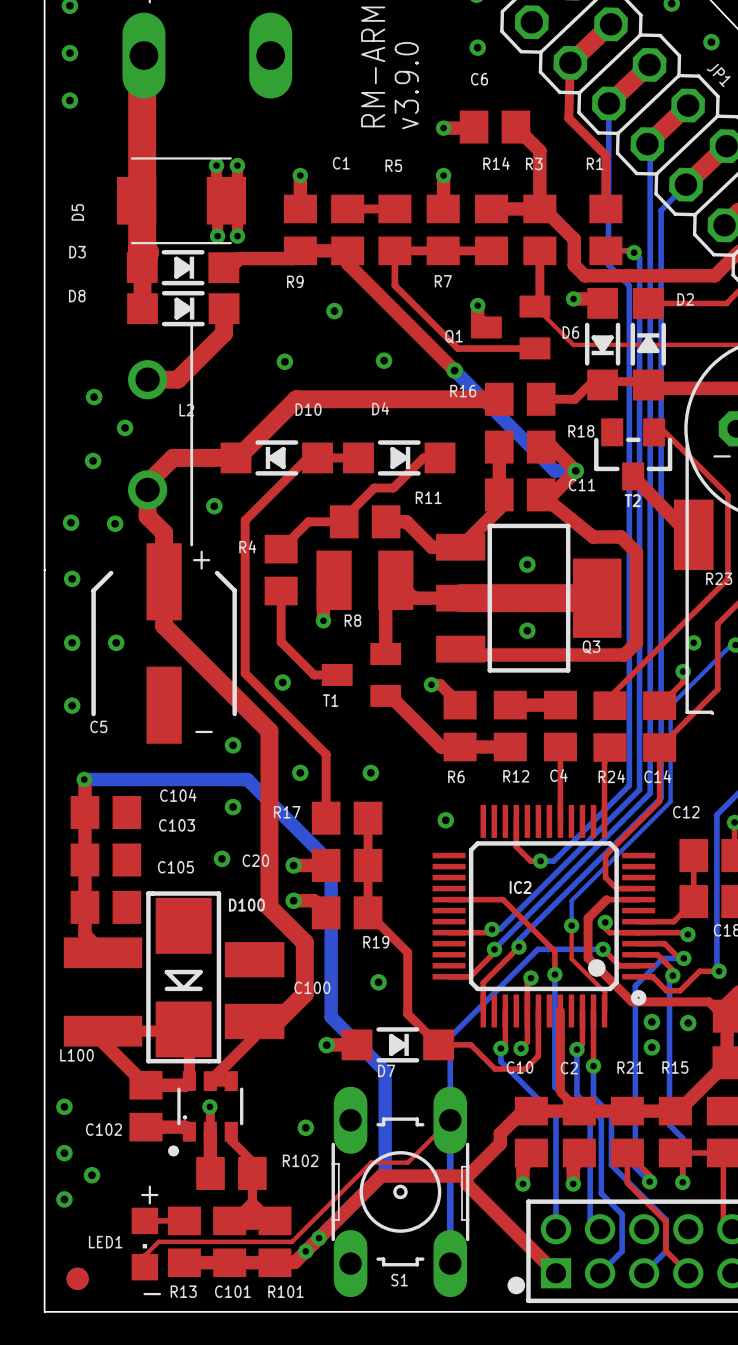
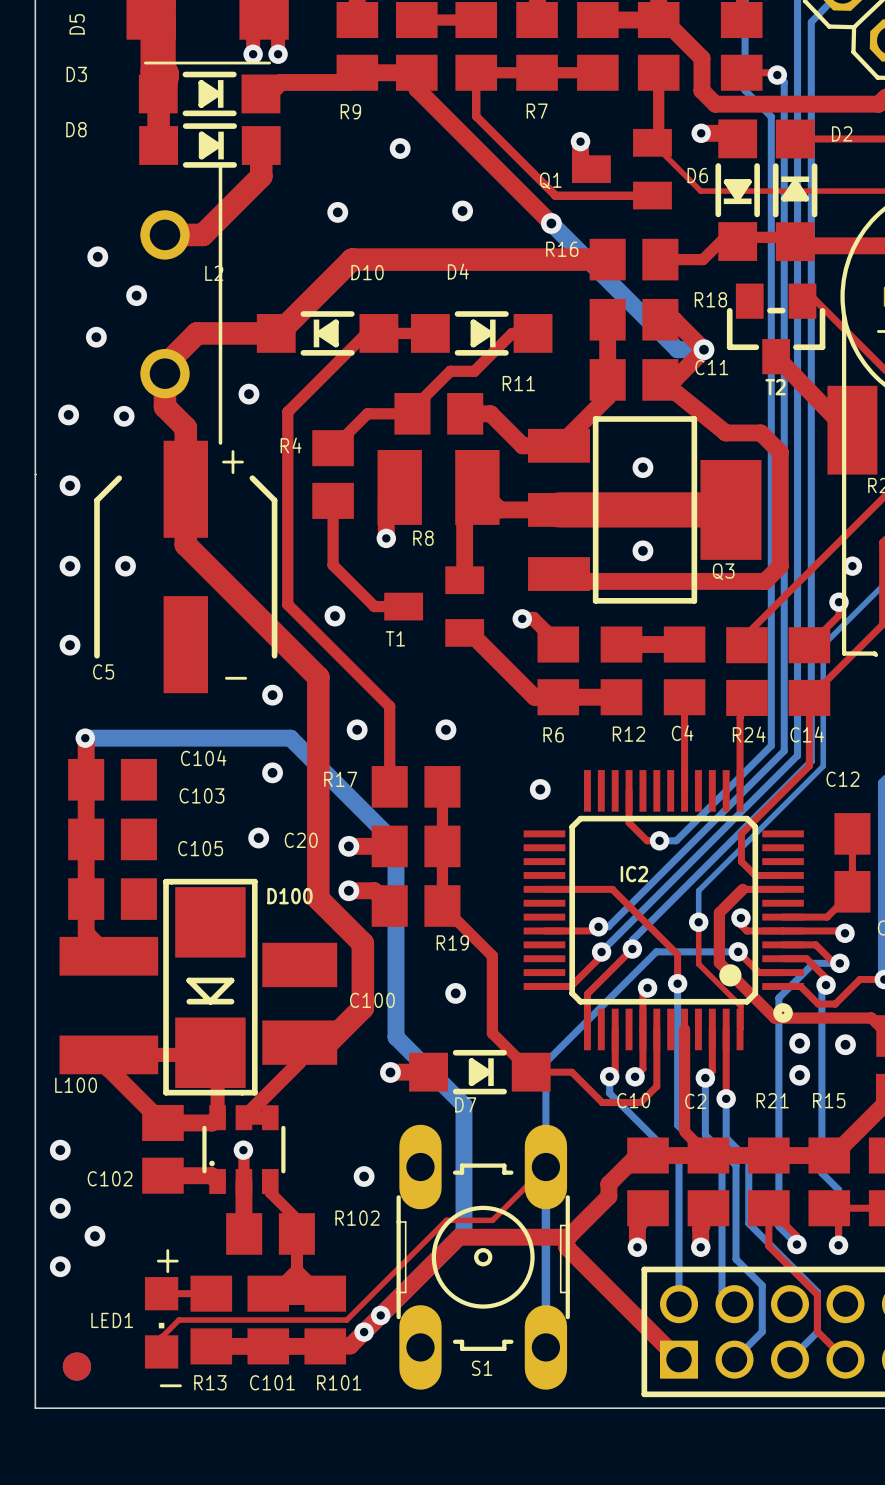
drawing: [168, 1145, 180, 1157] -> none
drawing: [507, 1276, 526, 1295] -> none

